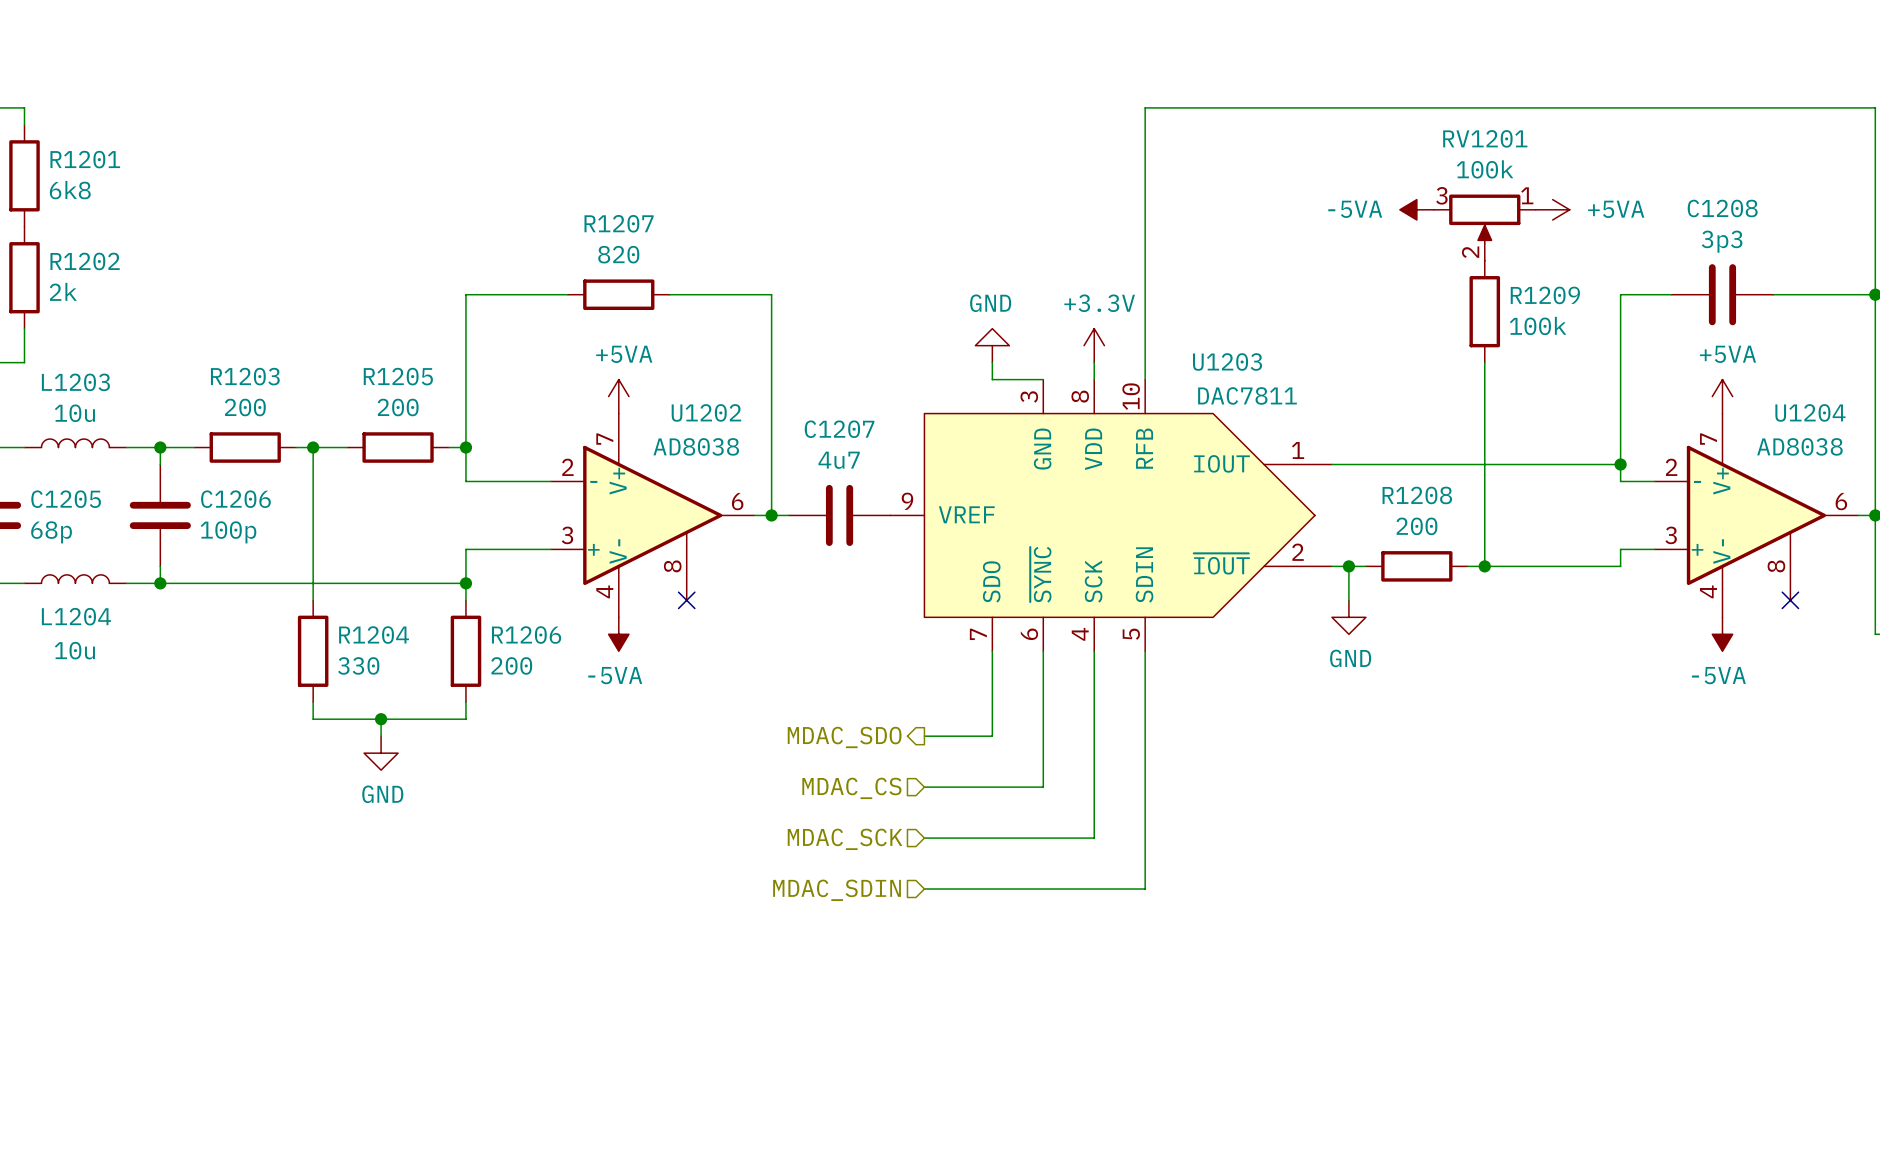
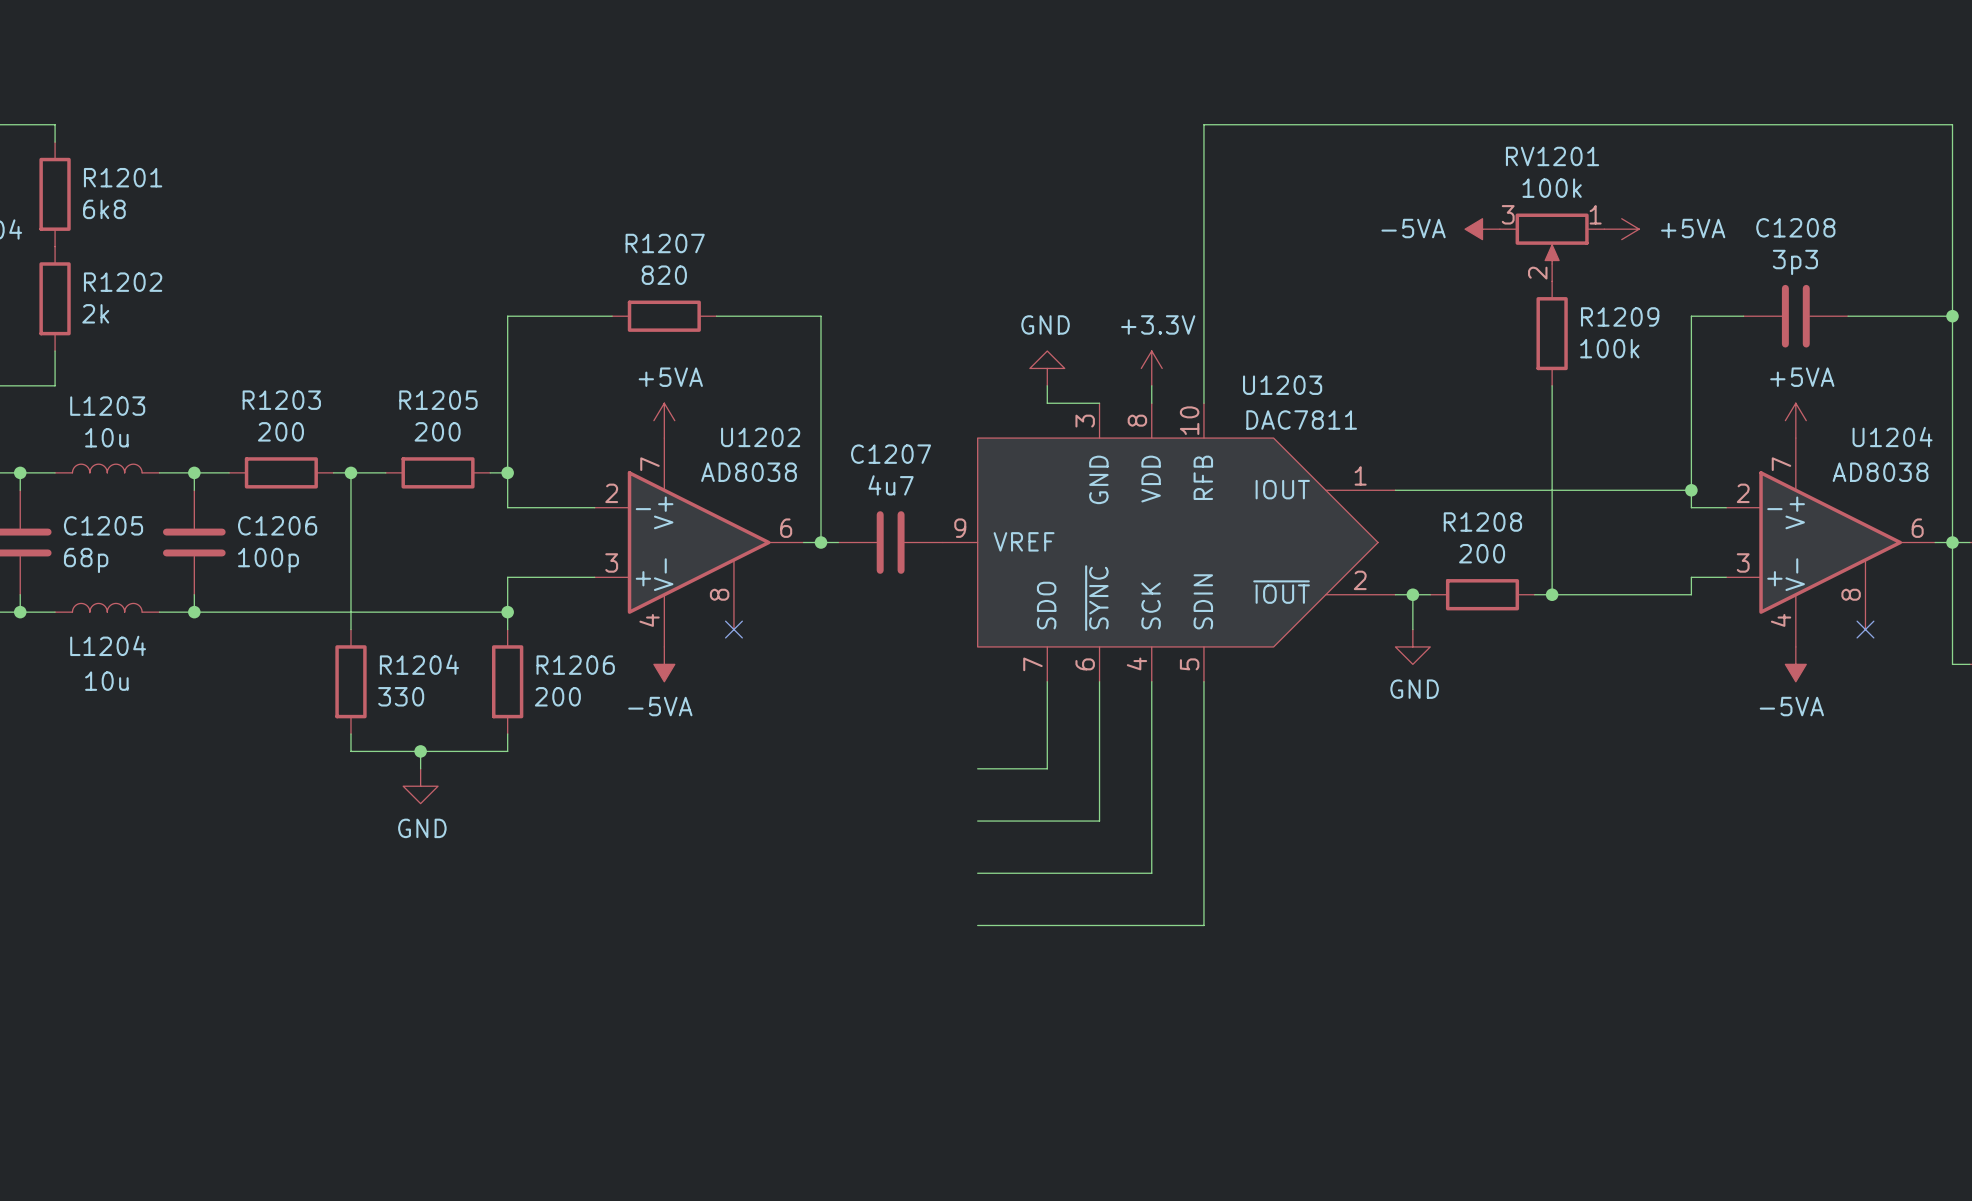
hierarchical label: MDAC_SDO (844, 737) -> none
hierarchical label: MDAC_CS (851, 788) -> none
hierarchical label: MDAC_SCK (845, 839) -> none
hierarchical label: MDAC_SDIN (837, 890) -> none

